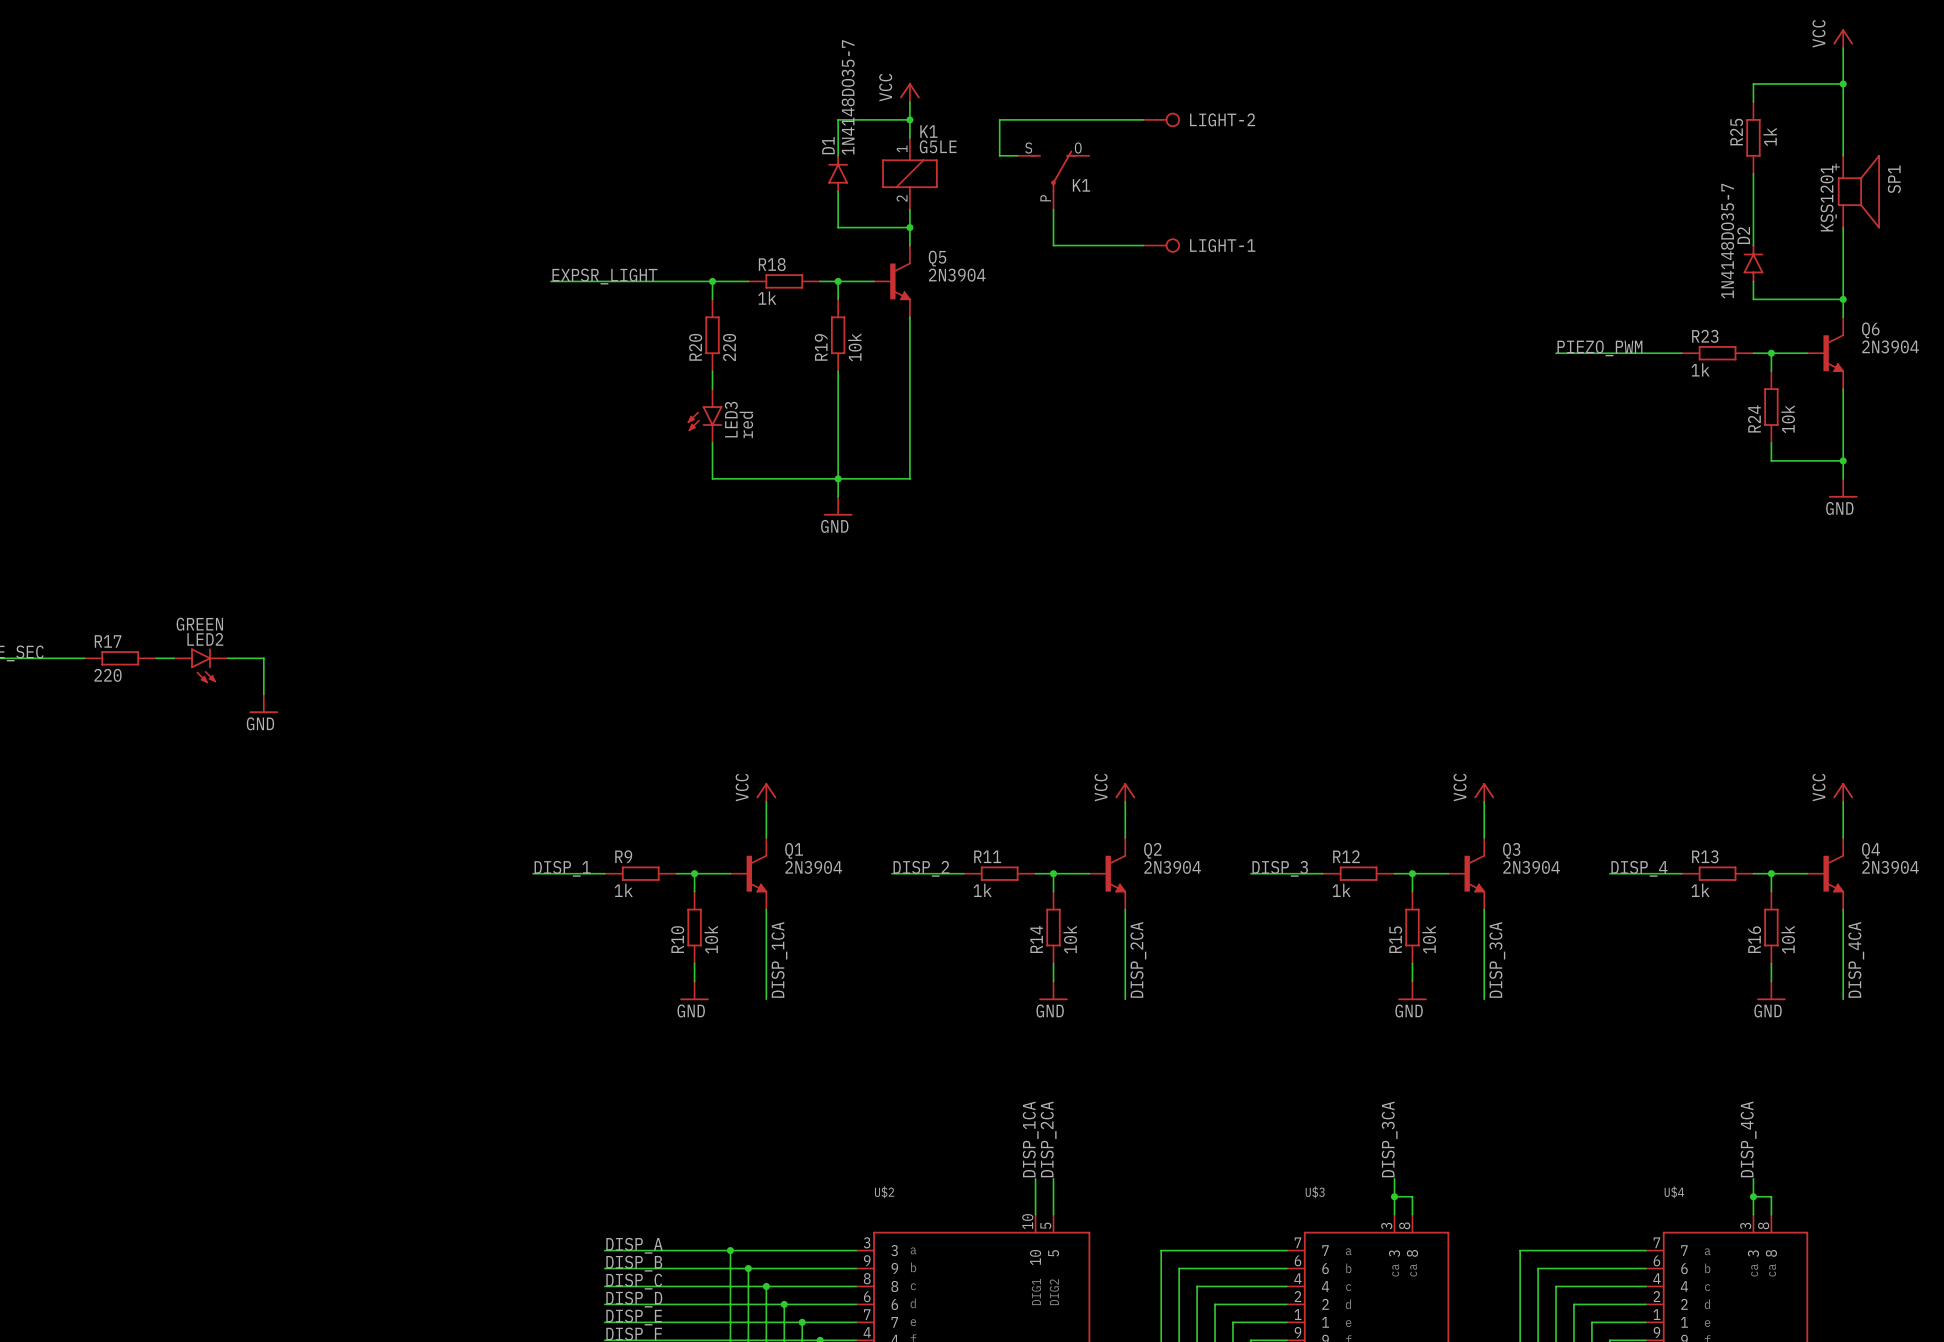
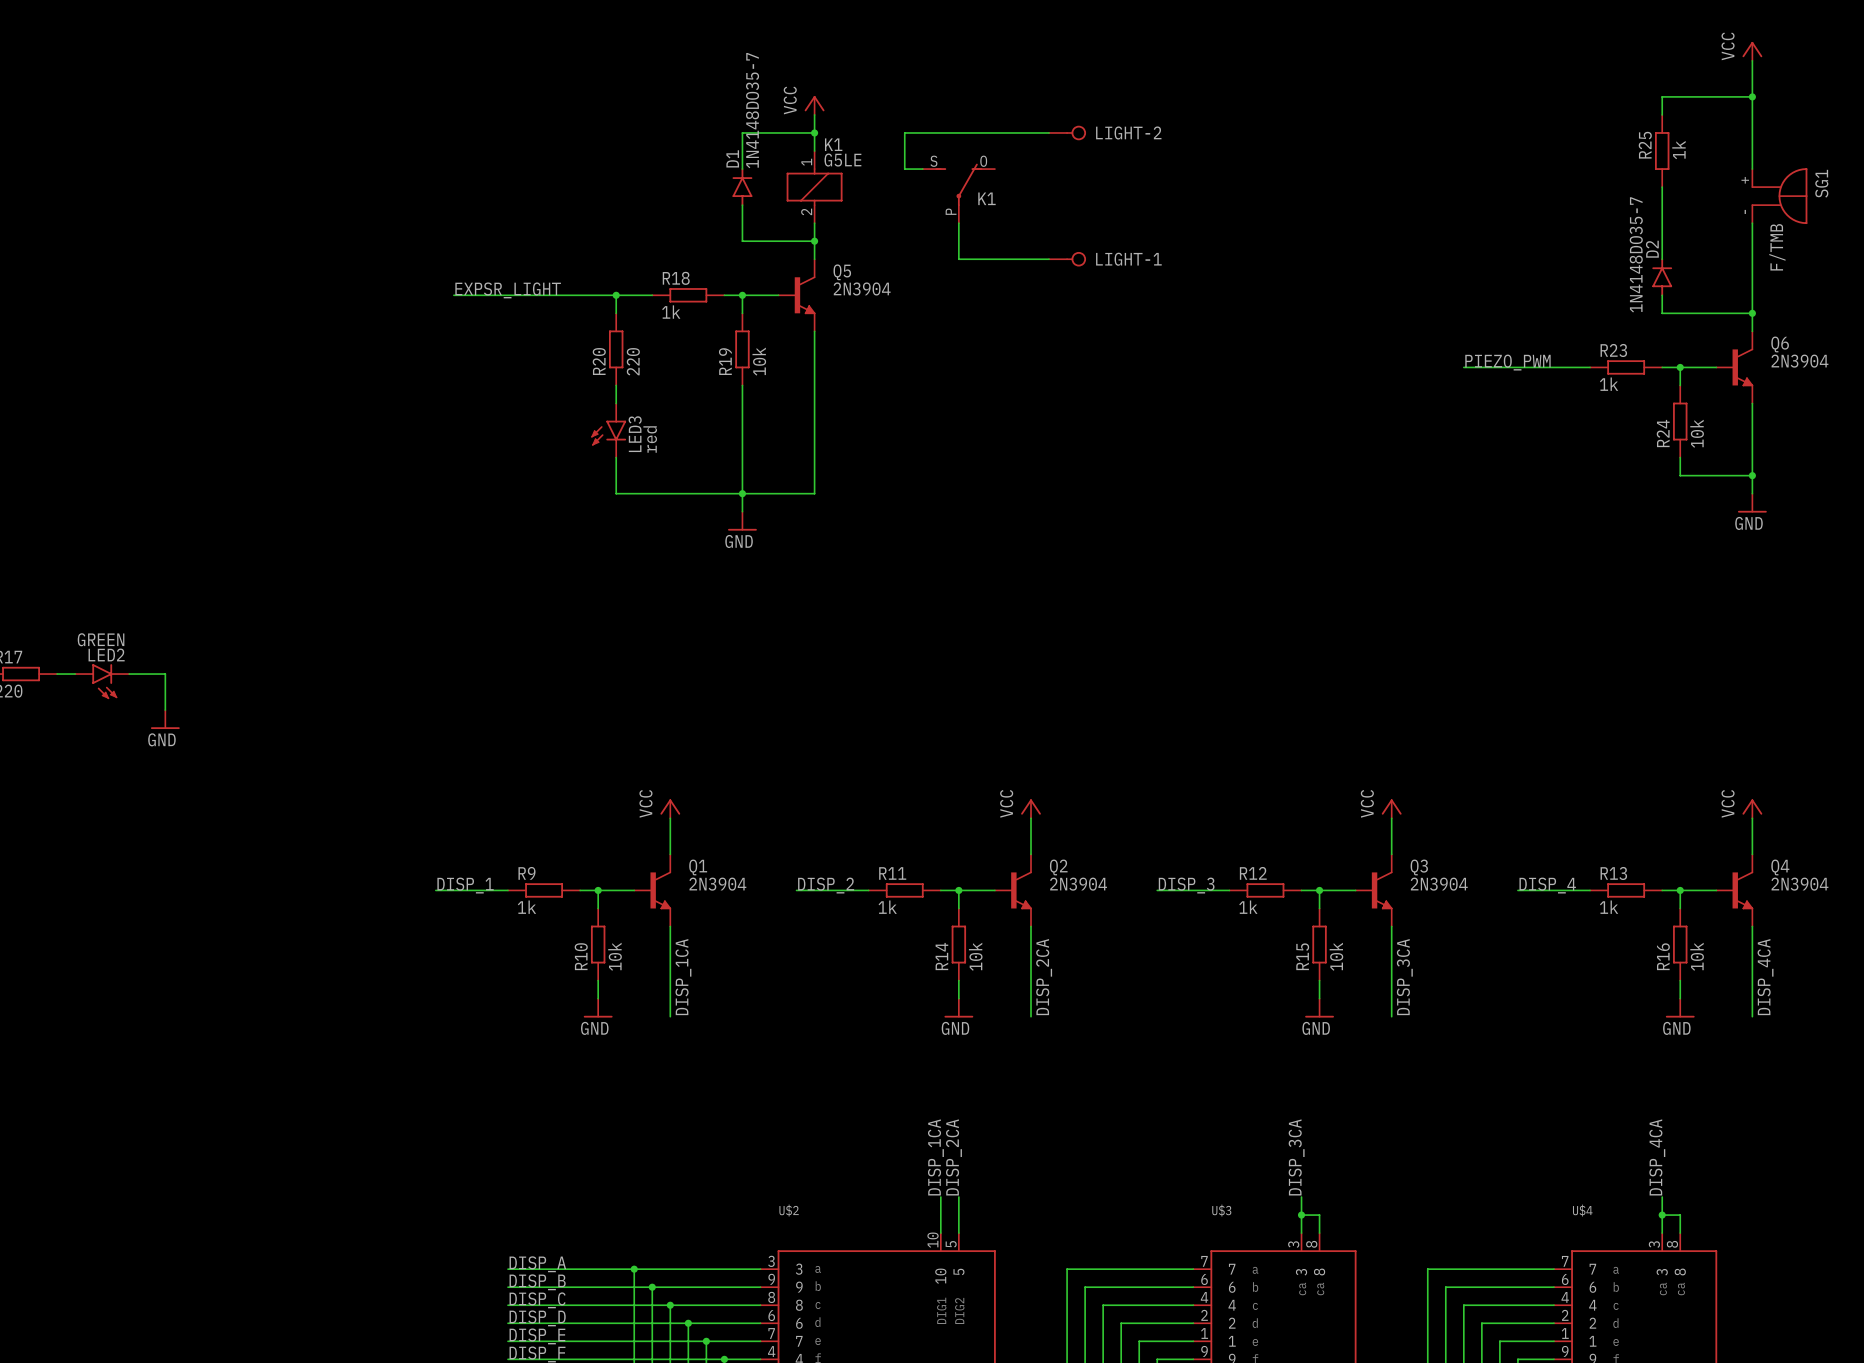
SG1: none -> F/TMB (1779, 196)
SP1: KSS1201 (1858, 191) -> none

